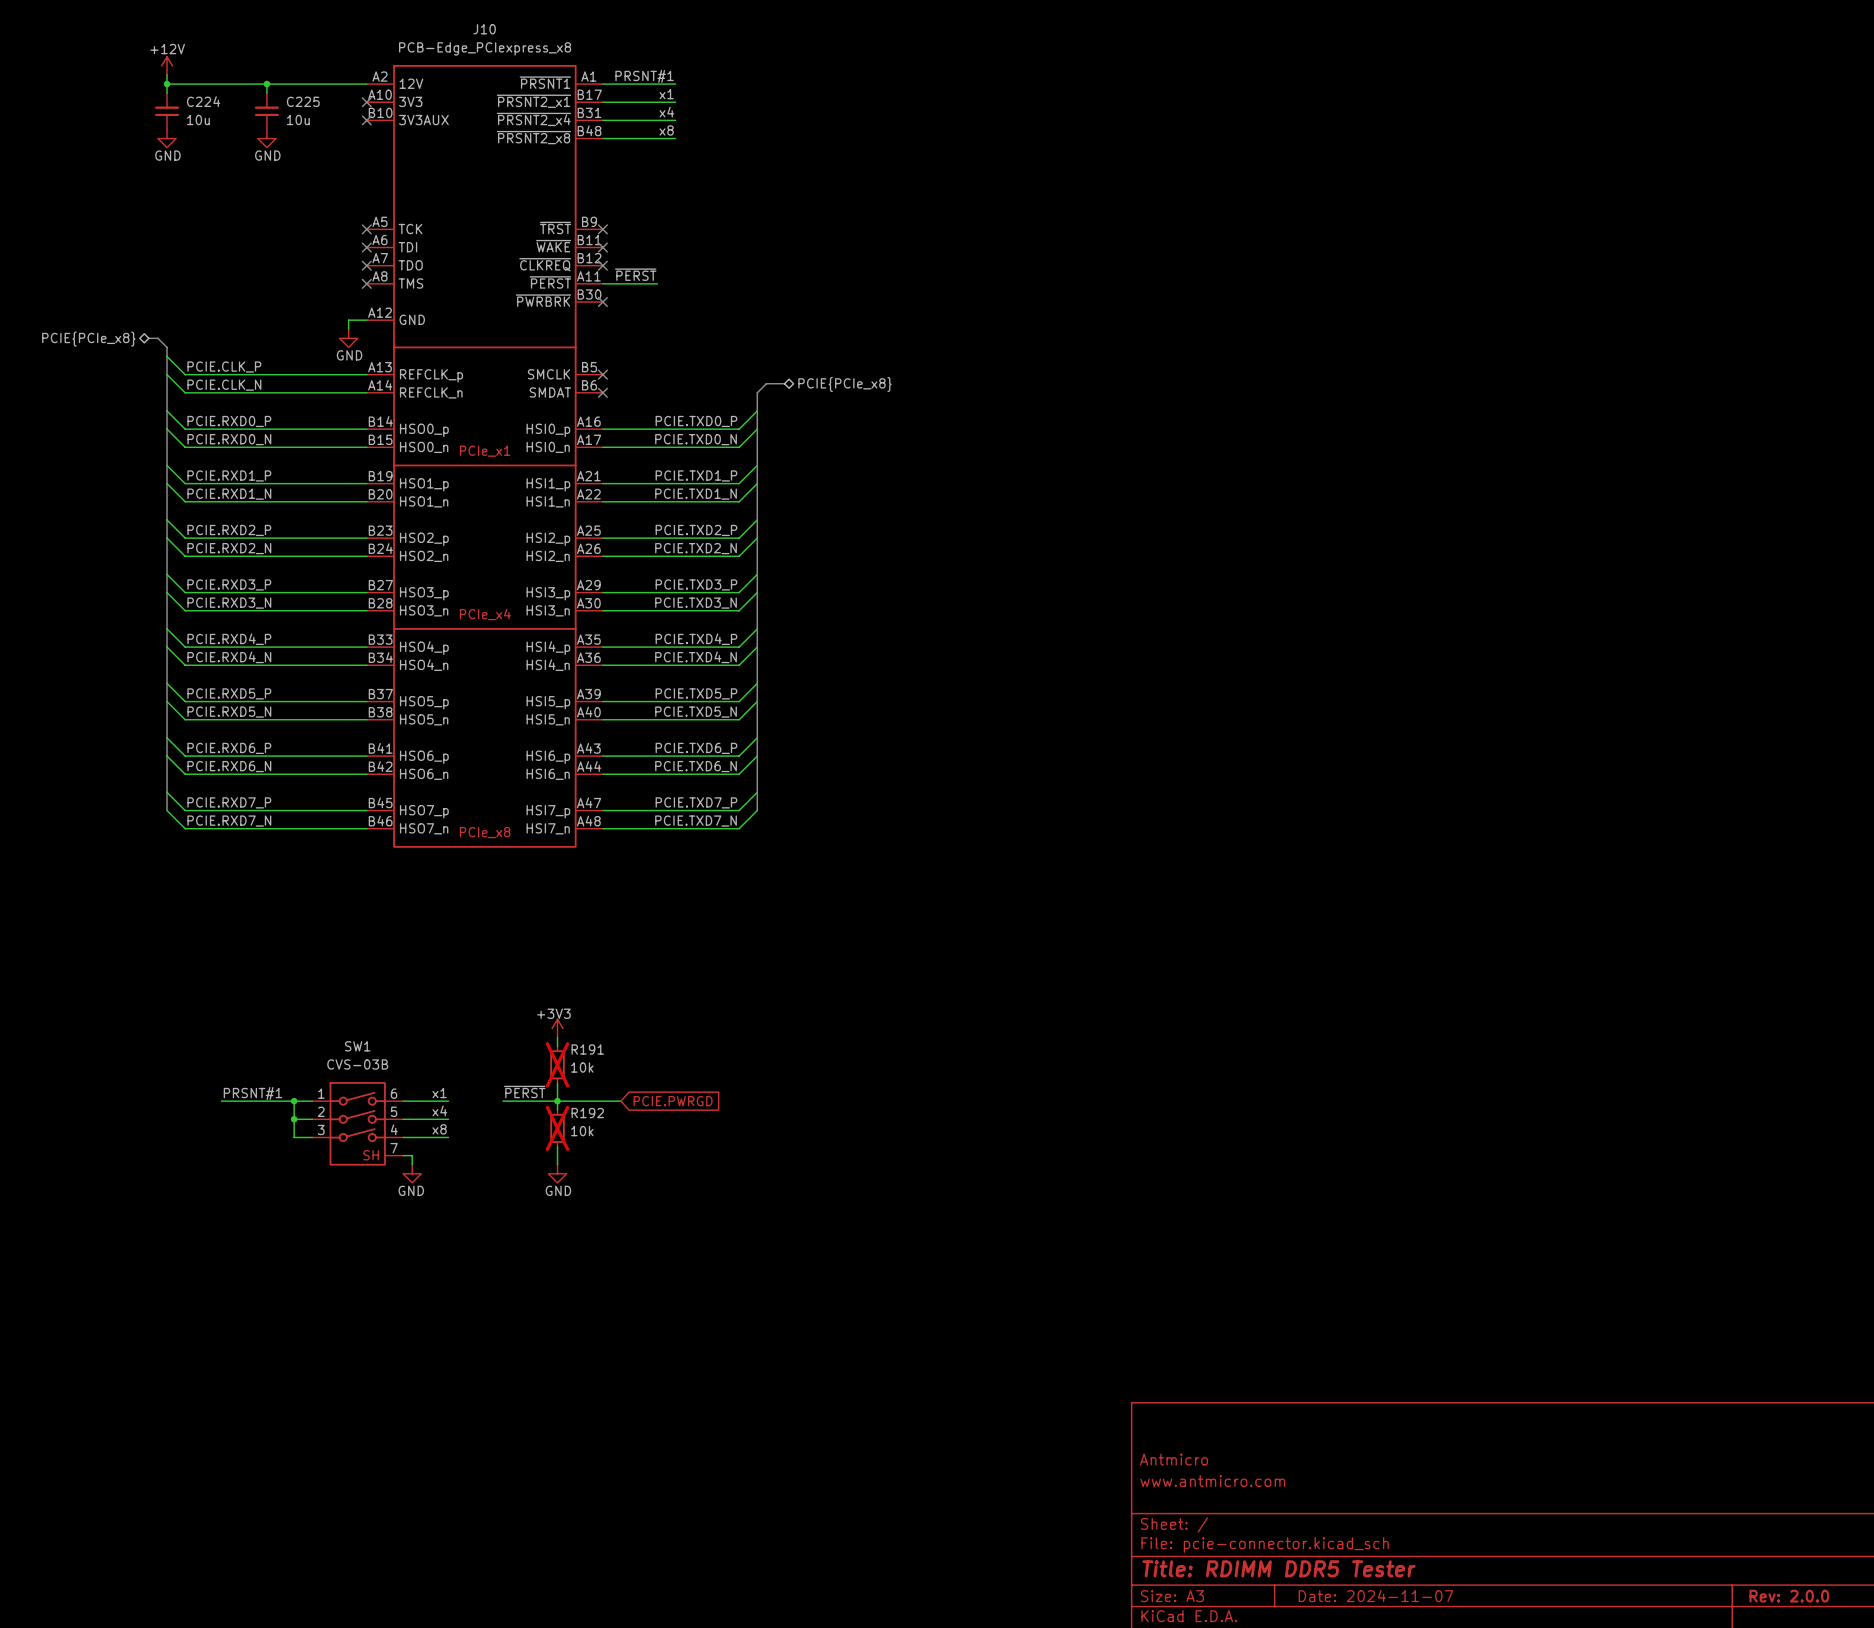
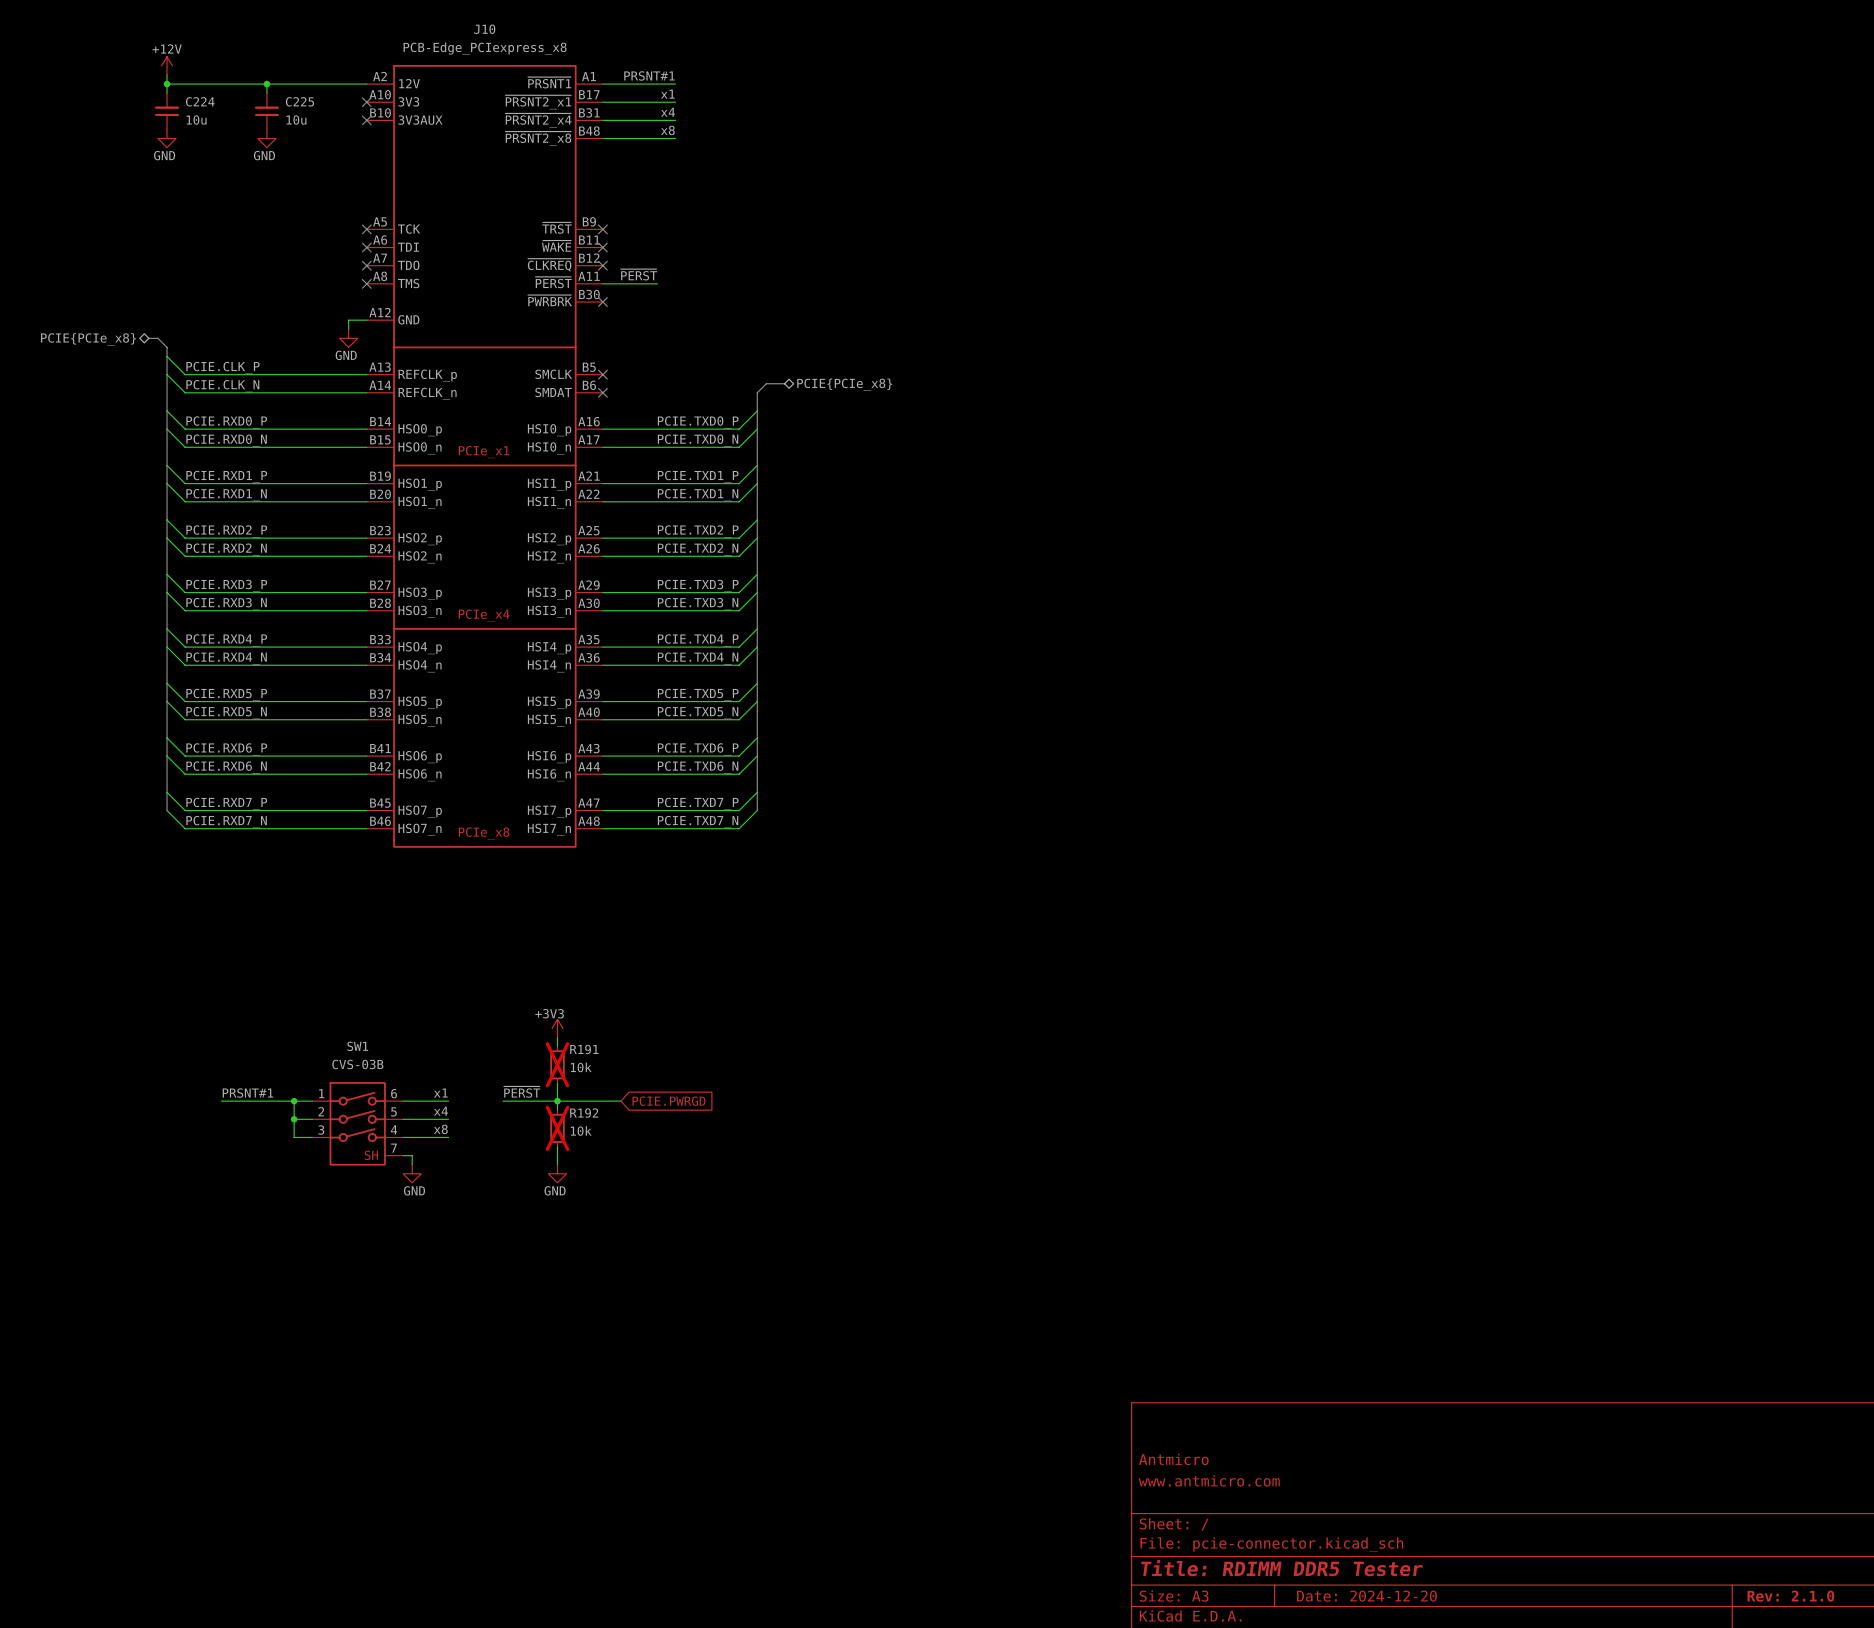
title block: Date: 2024-11-07 (1375, 1595) -> Date: 2024-12-20 (1366, 1596)
title block: Rev: 2.0.0 (1789, 1596) -> Rev: 2.1.0 (1790, 1596)

